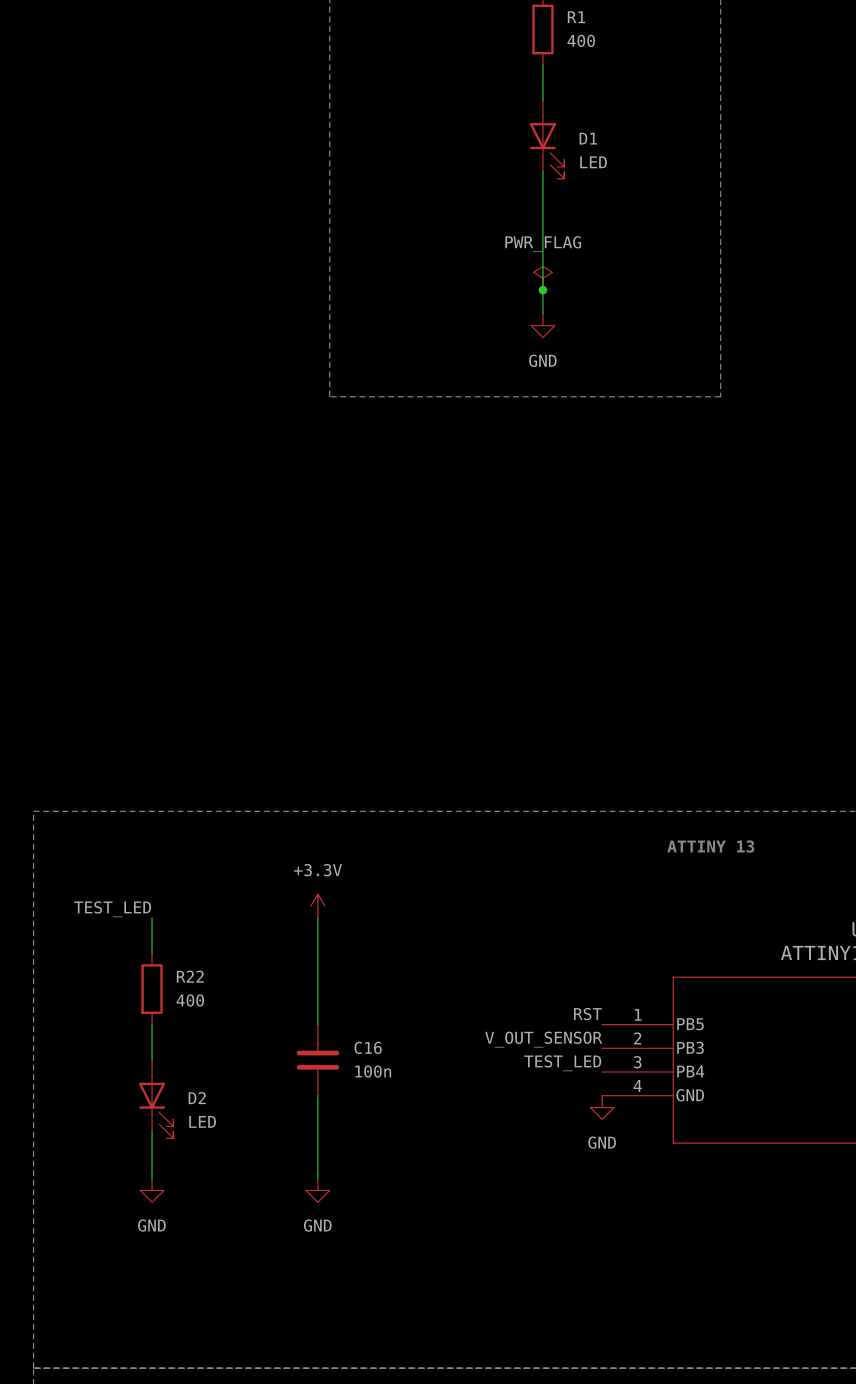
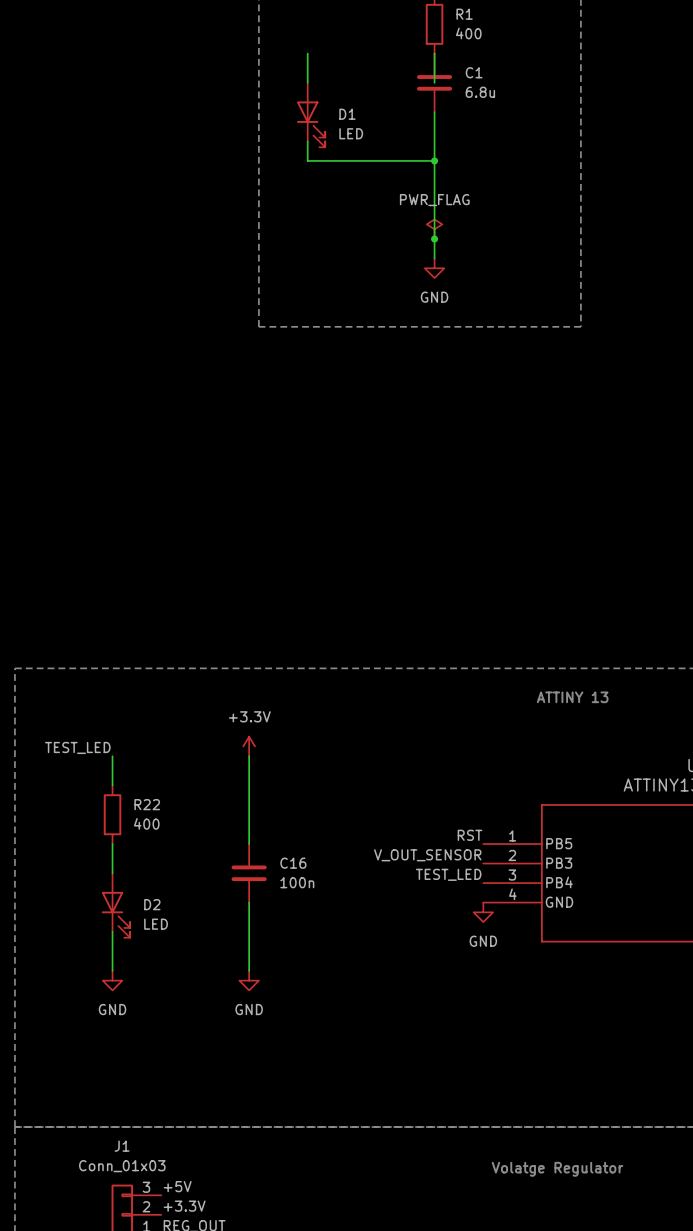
wire: none -> (307, 53) (307, 82)
C1: none -> 6.8u (434, 82)
D1 position: (547, 139) -> (311, 115)
wire: none -> (307, 141) (307, 160) (434, 160)
junction: none -> (434, 160)

